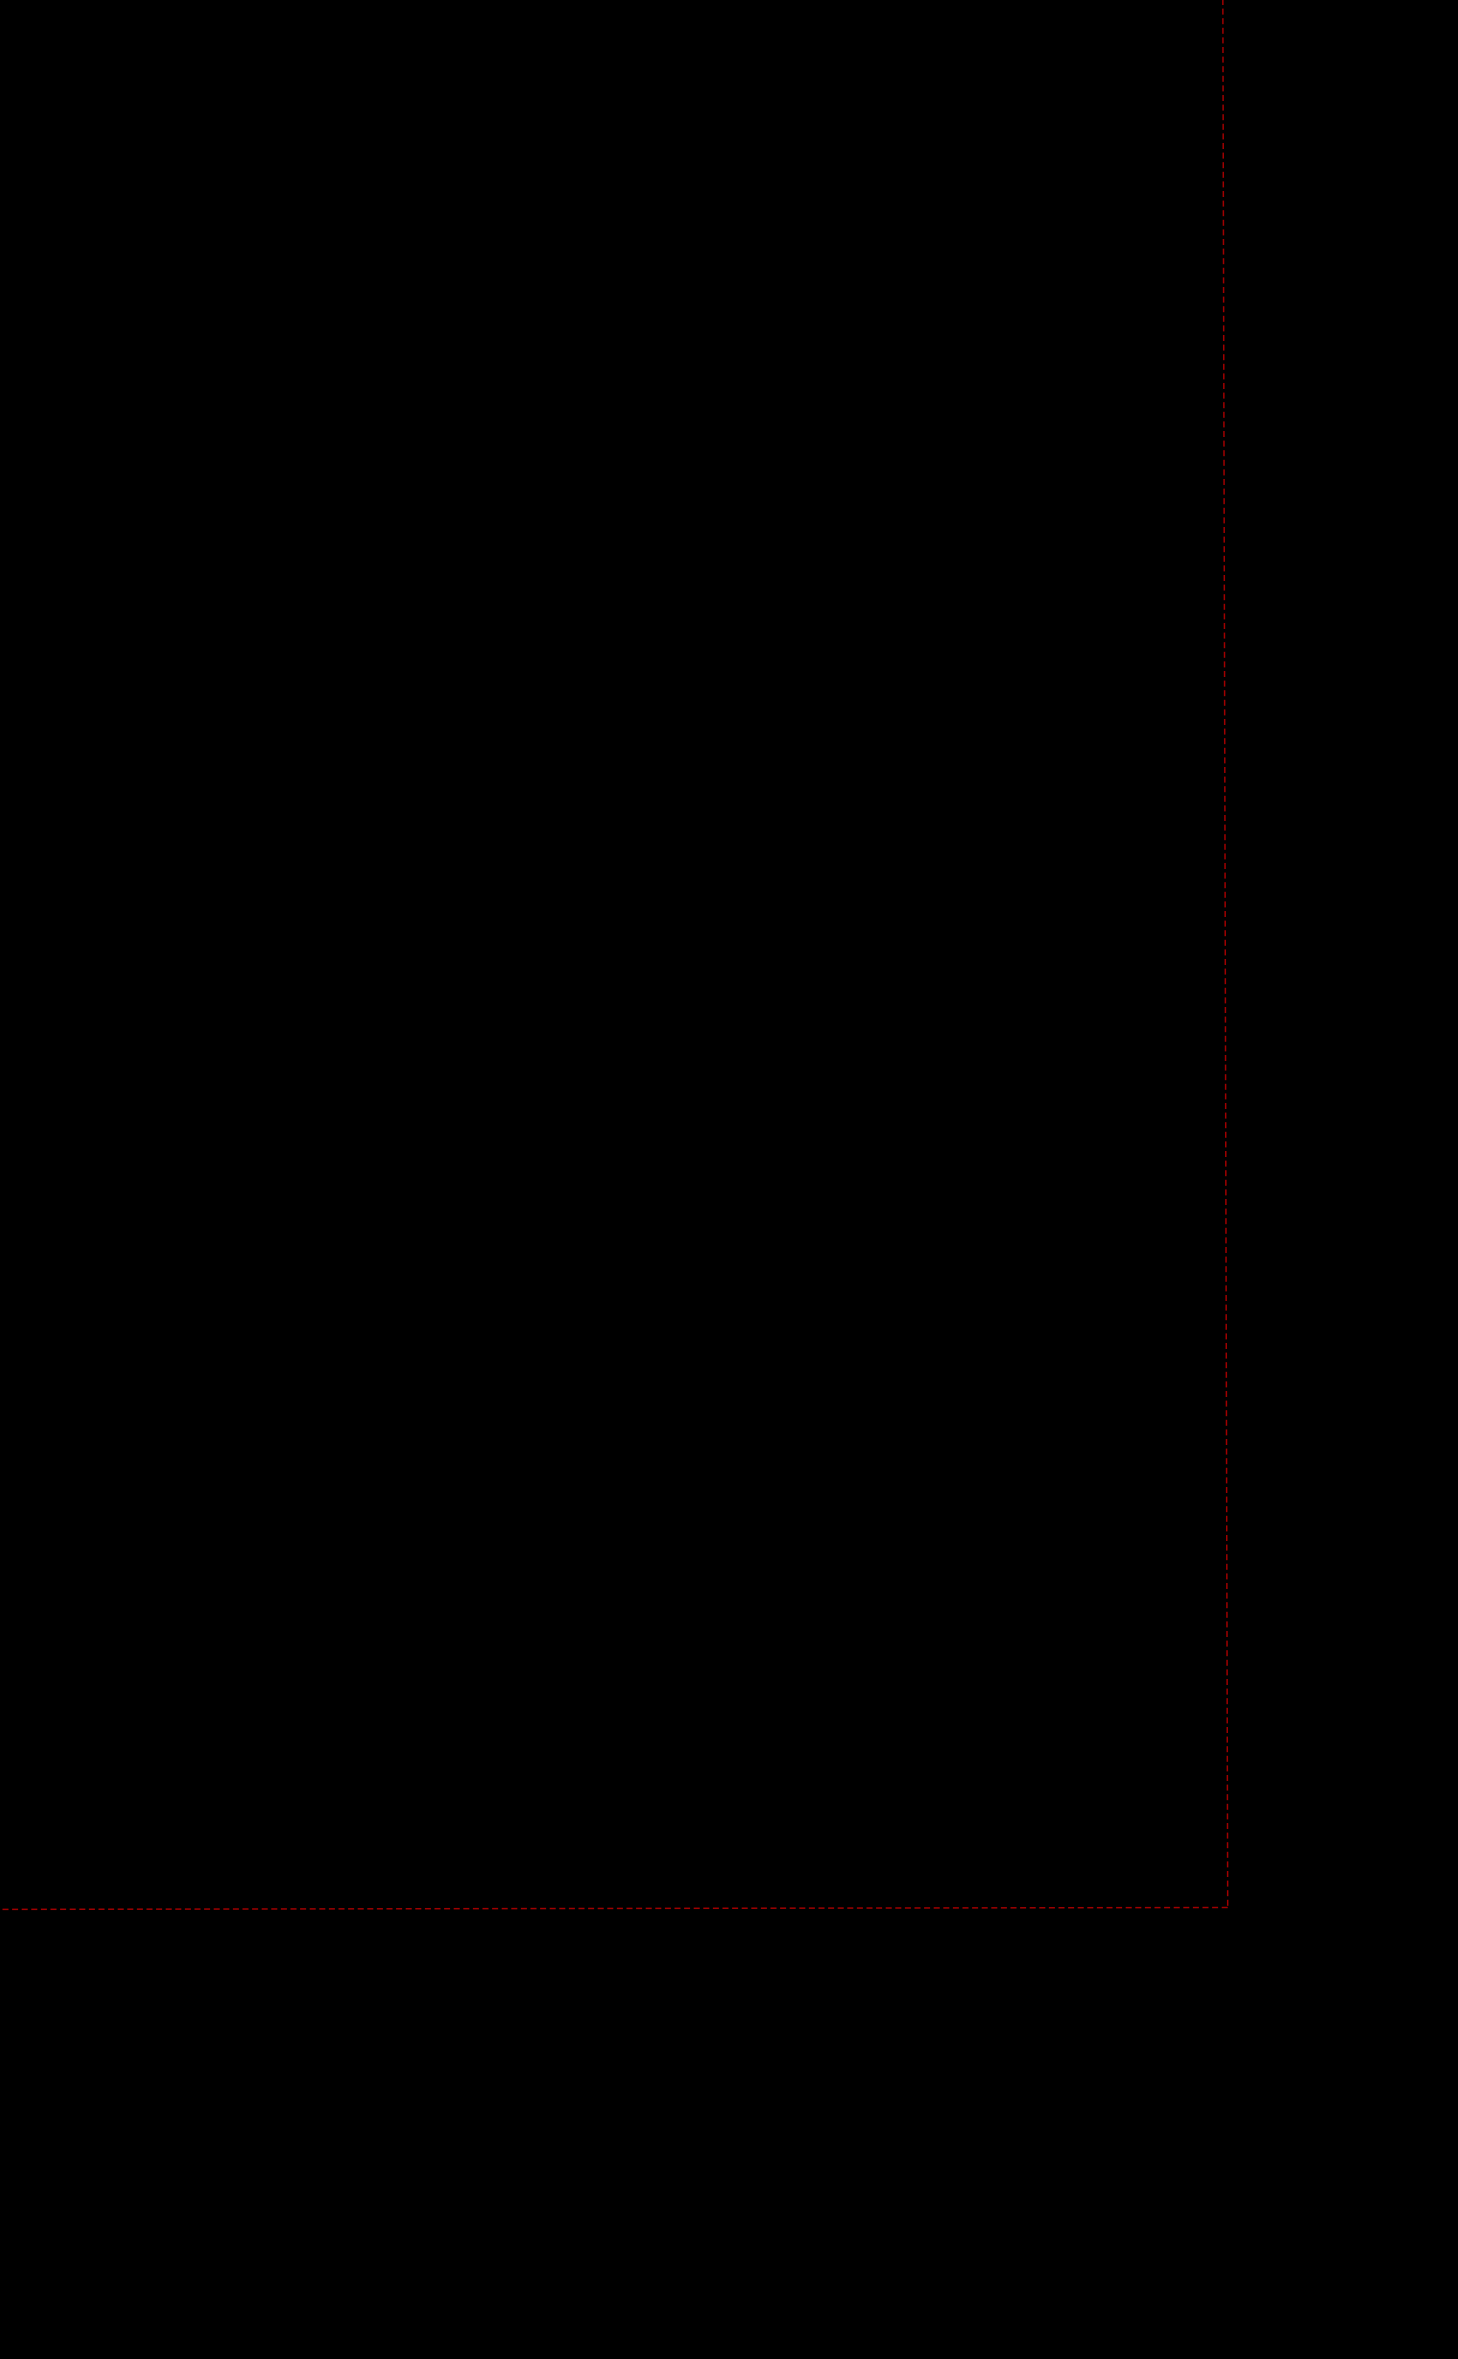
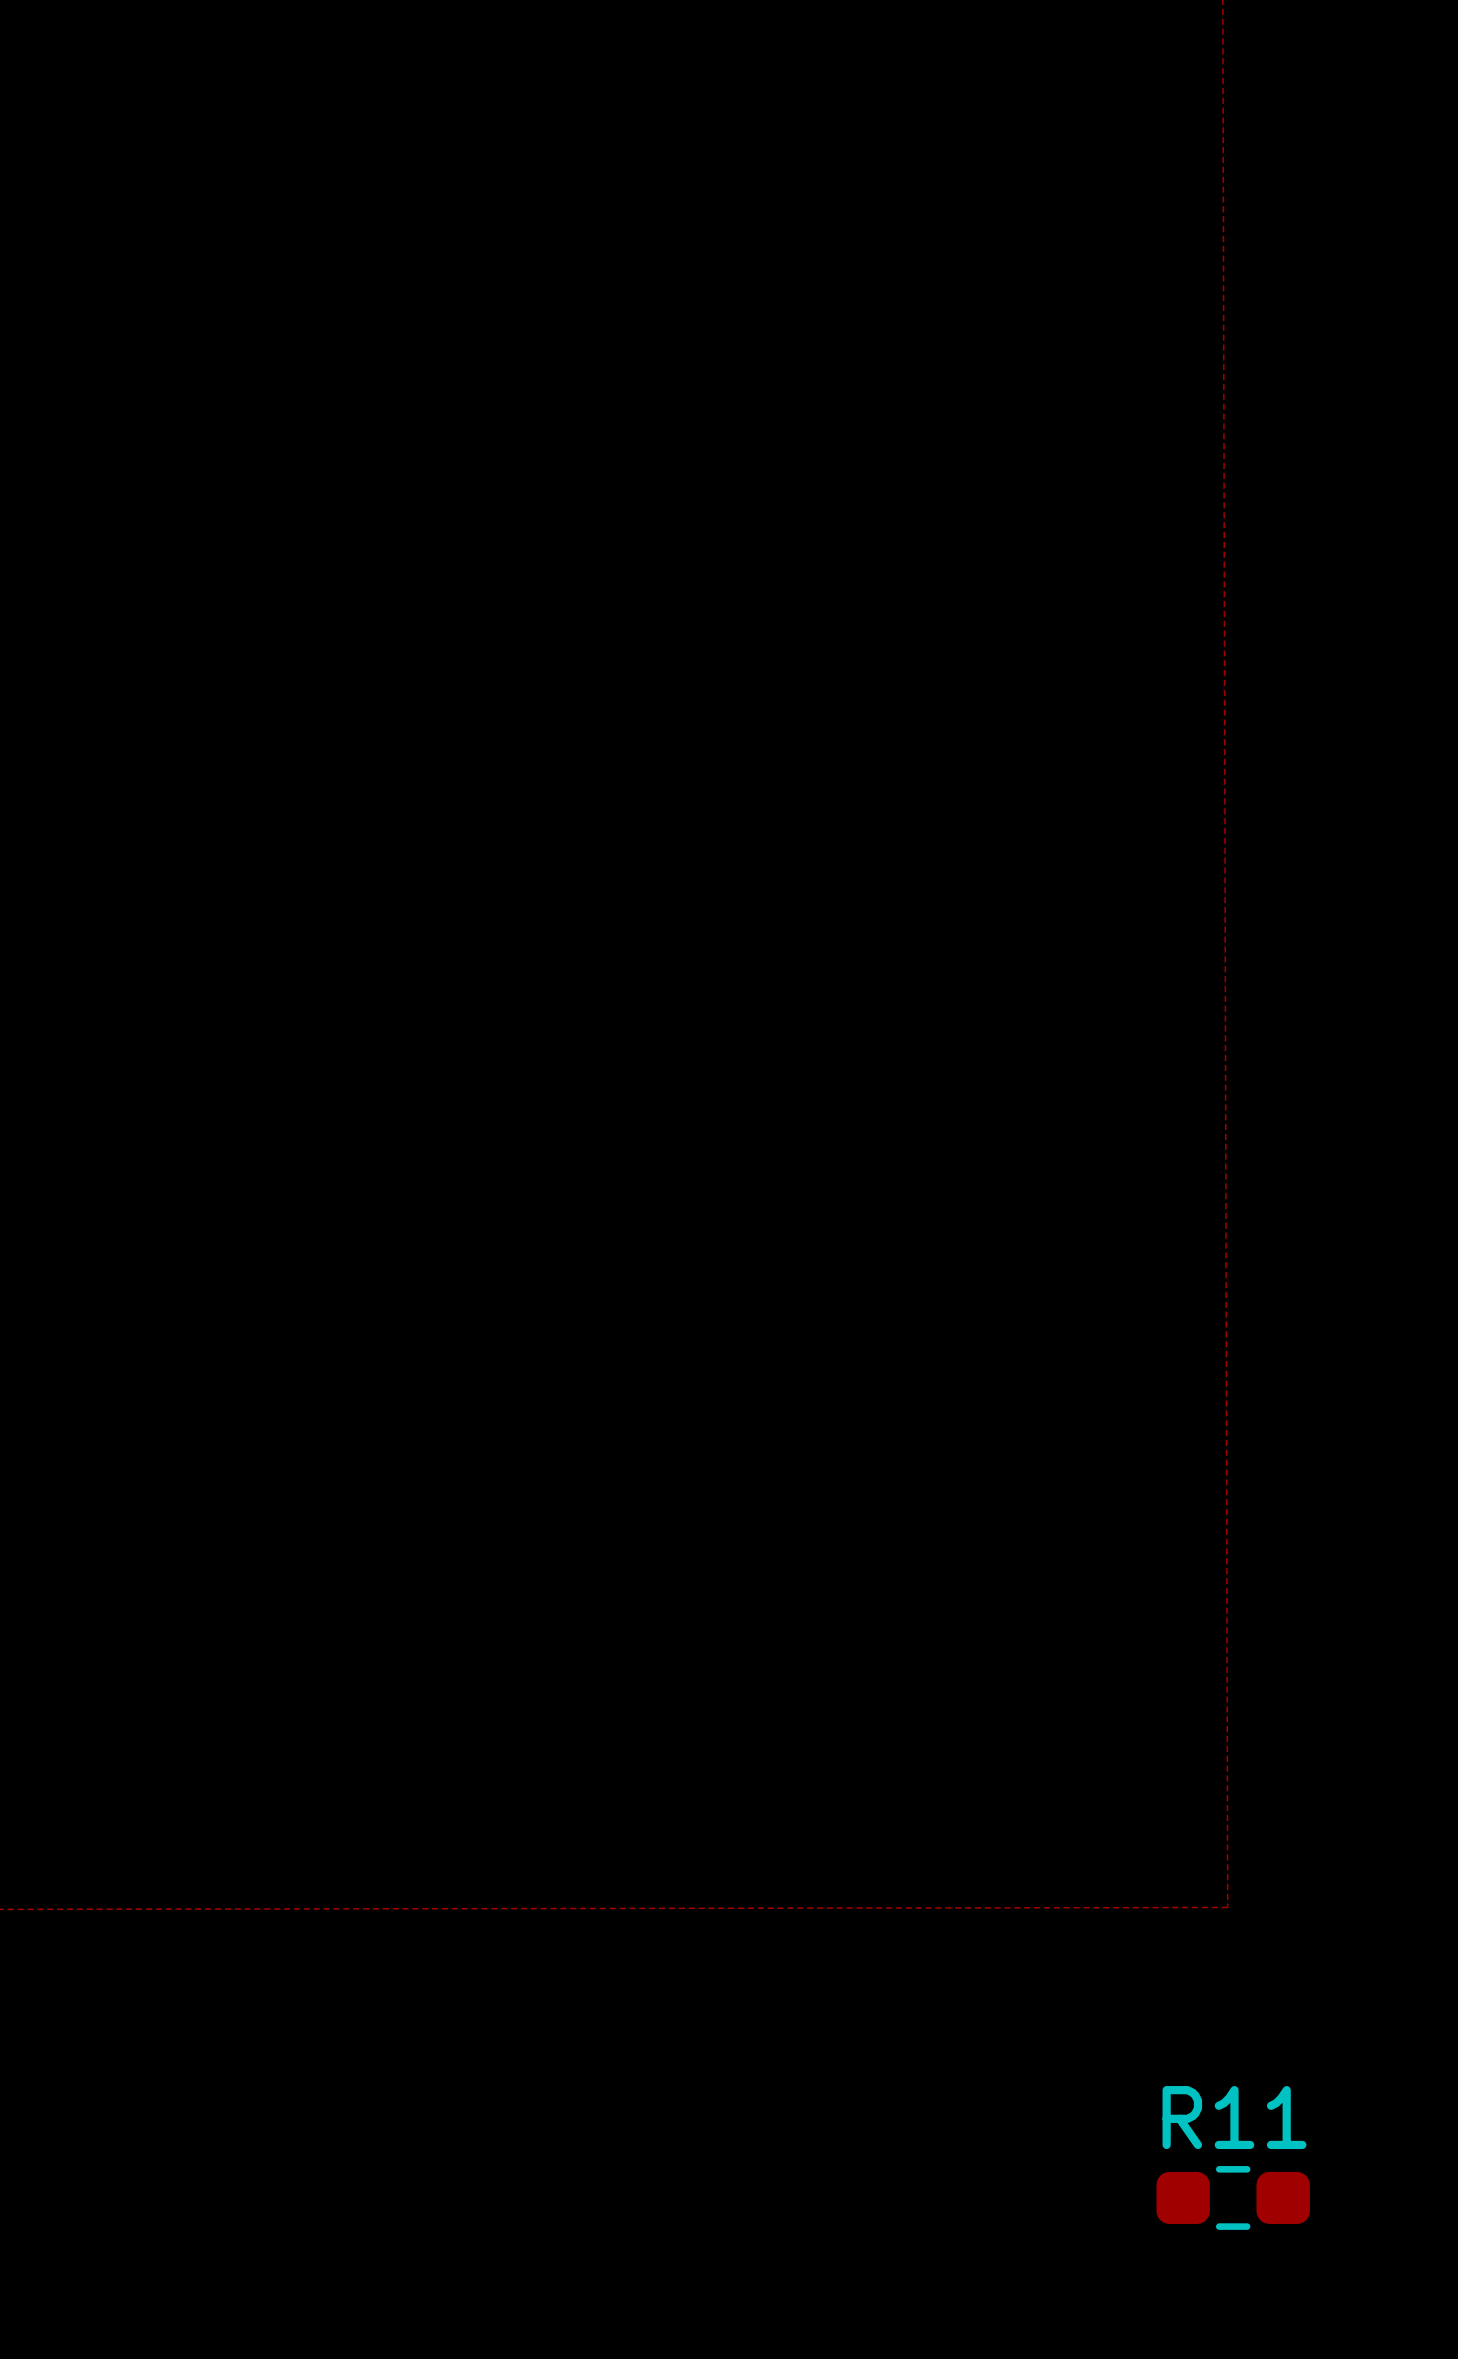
R11: none -> (1233, 2197)

